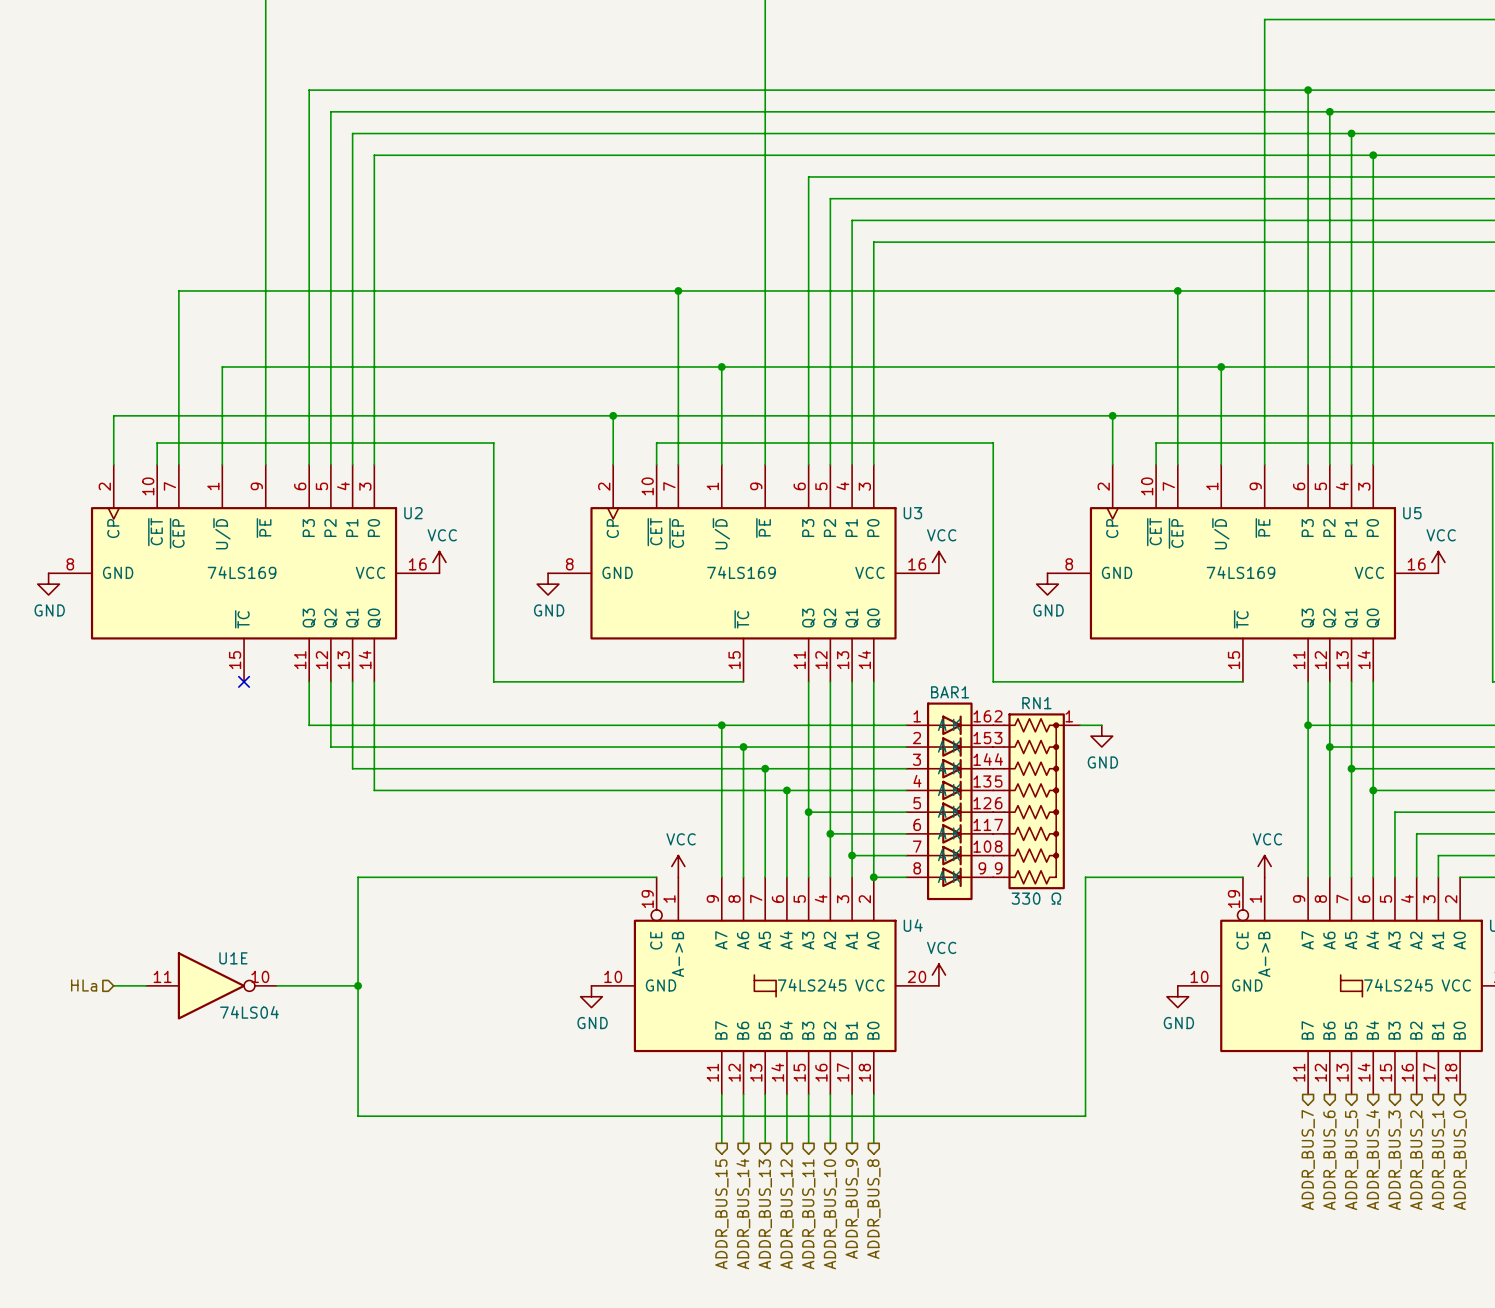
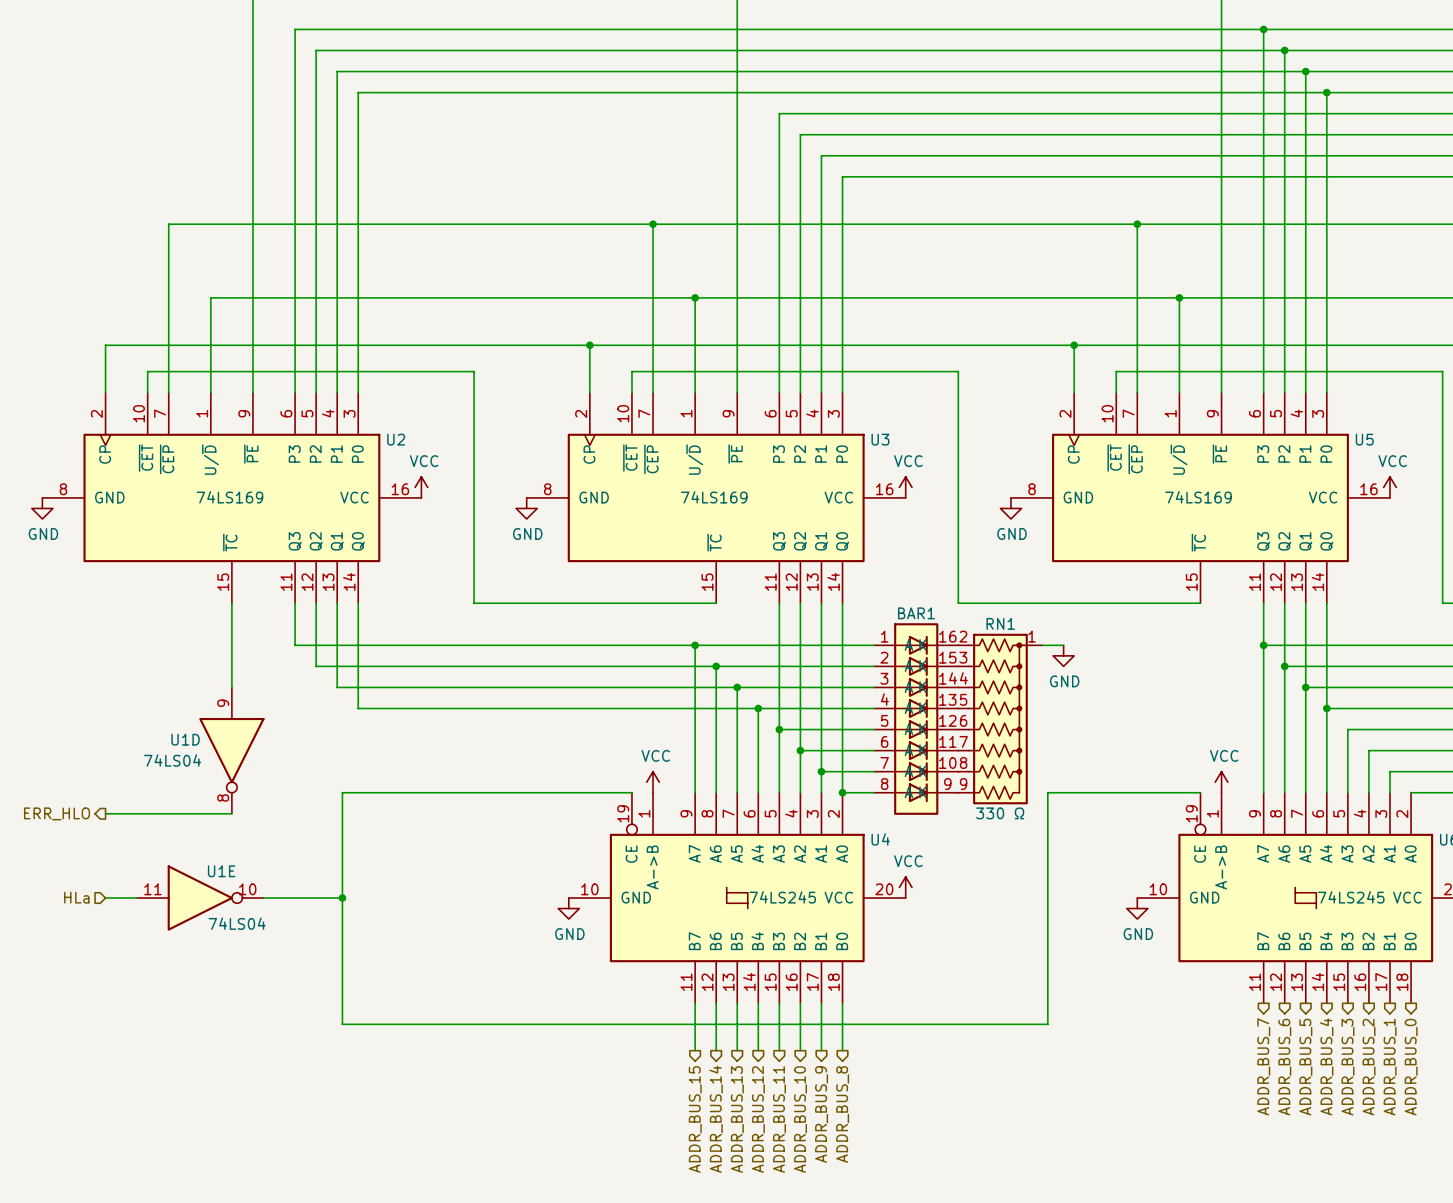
wire: none -> (231, 603) (231, 687)
no-connect mark: (244, 681) -> none
U1D: none -> 74LS04 (231, 750)
hierarchical label: none -> ERR_HLO (57, 813)
wire: none -> (105, 813) (231, 813)

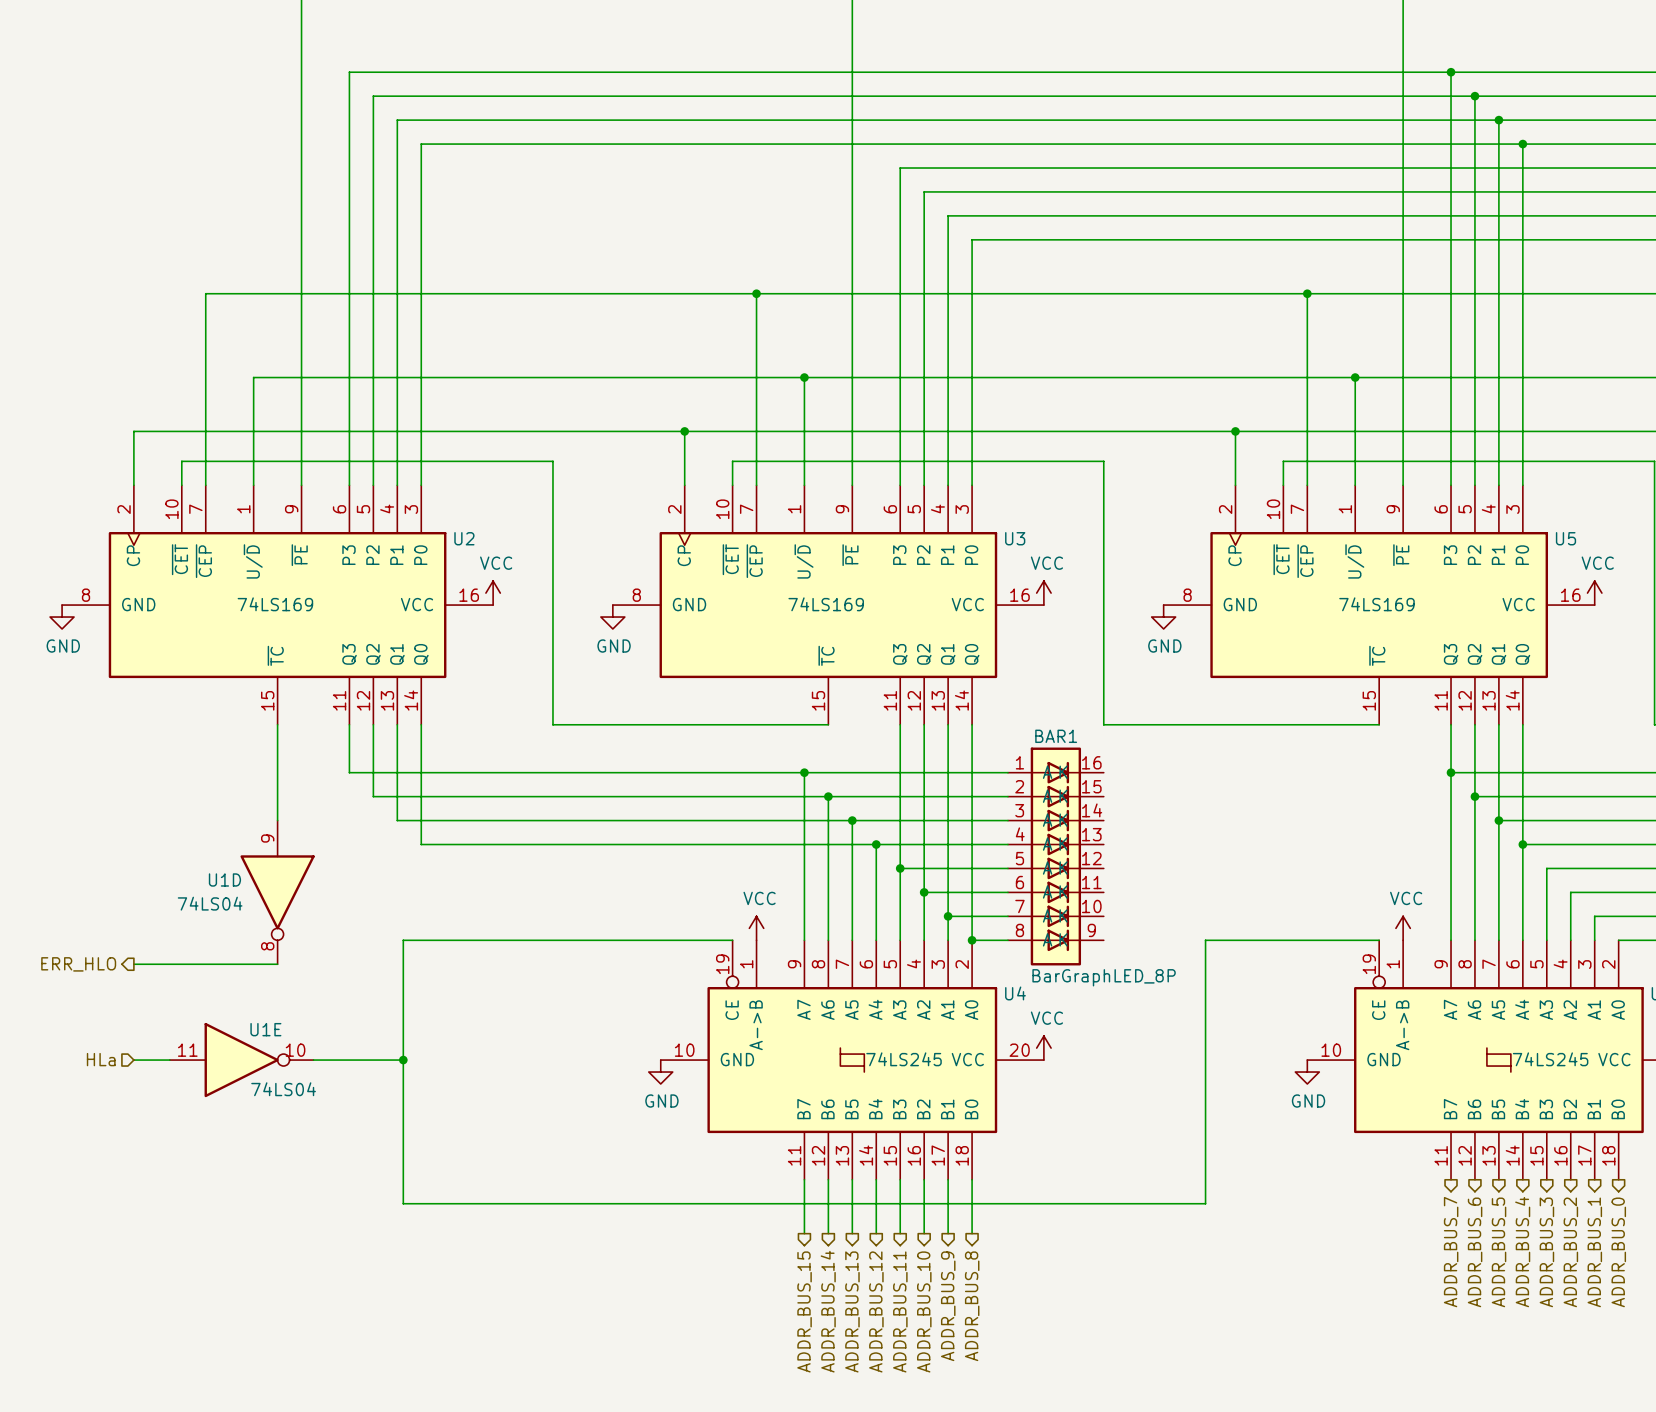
wire: (1042, 645) (1063, 645) -> none
power symbol: GND (1063, 655) -> none
RN1: 330 Ω (1000, 719) -> none
BAR1 value: none -> BarGraphLED_8P (1104, 977)

